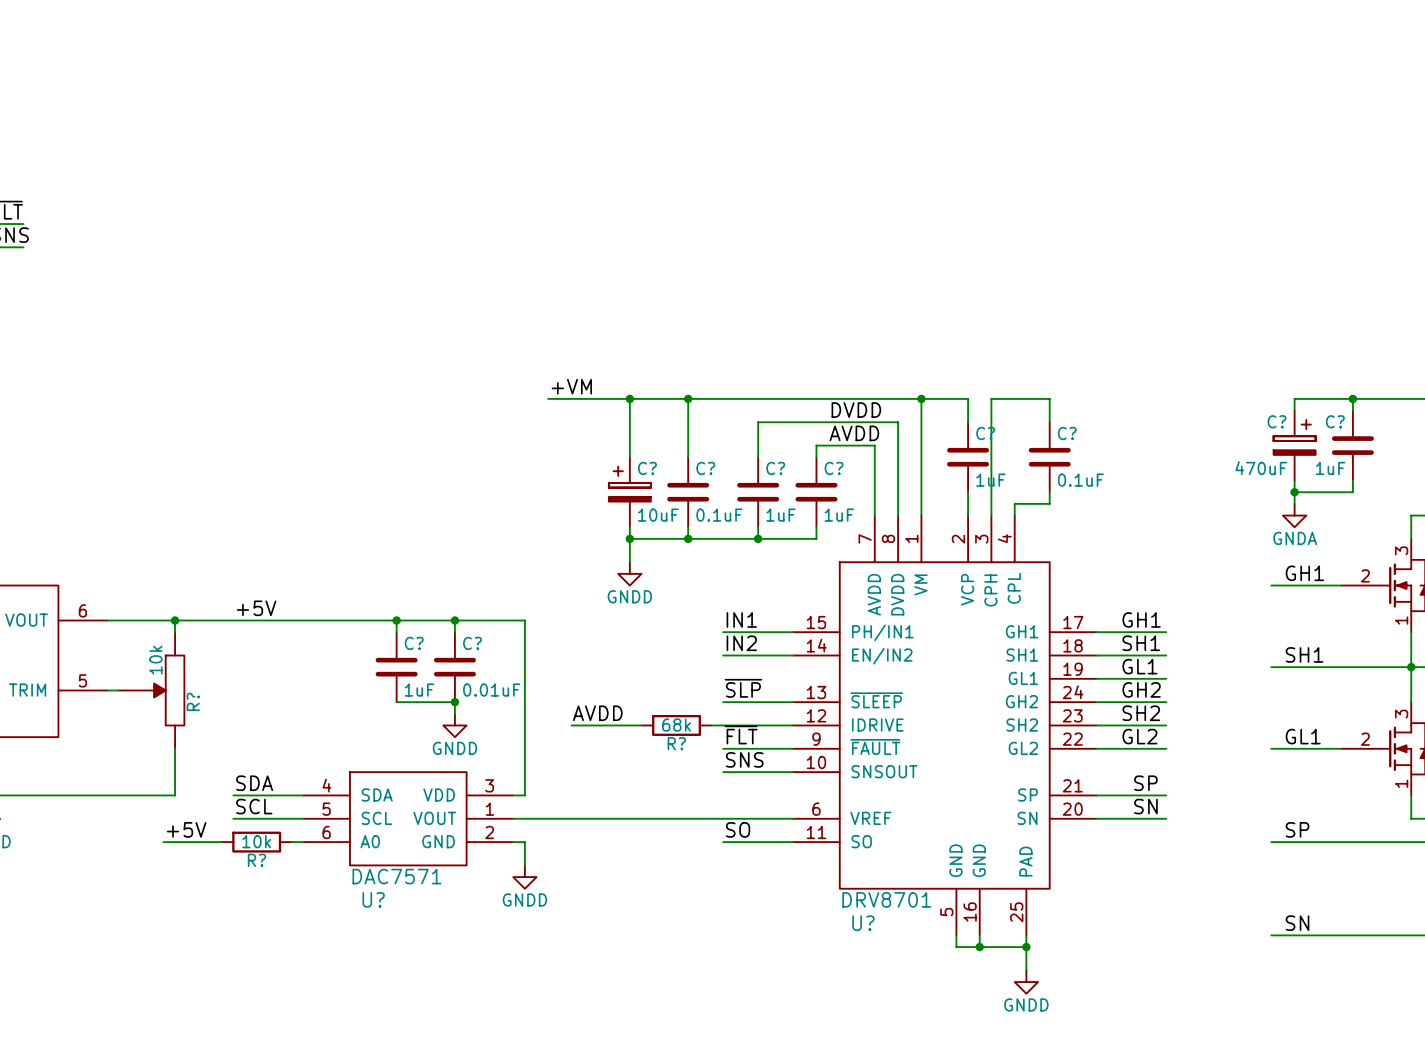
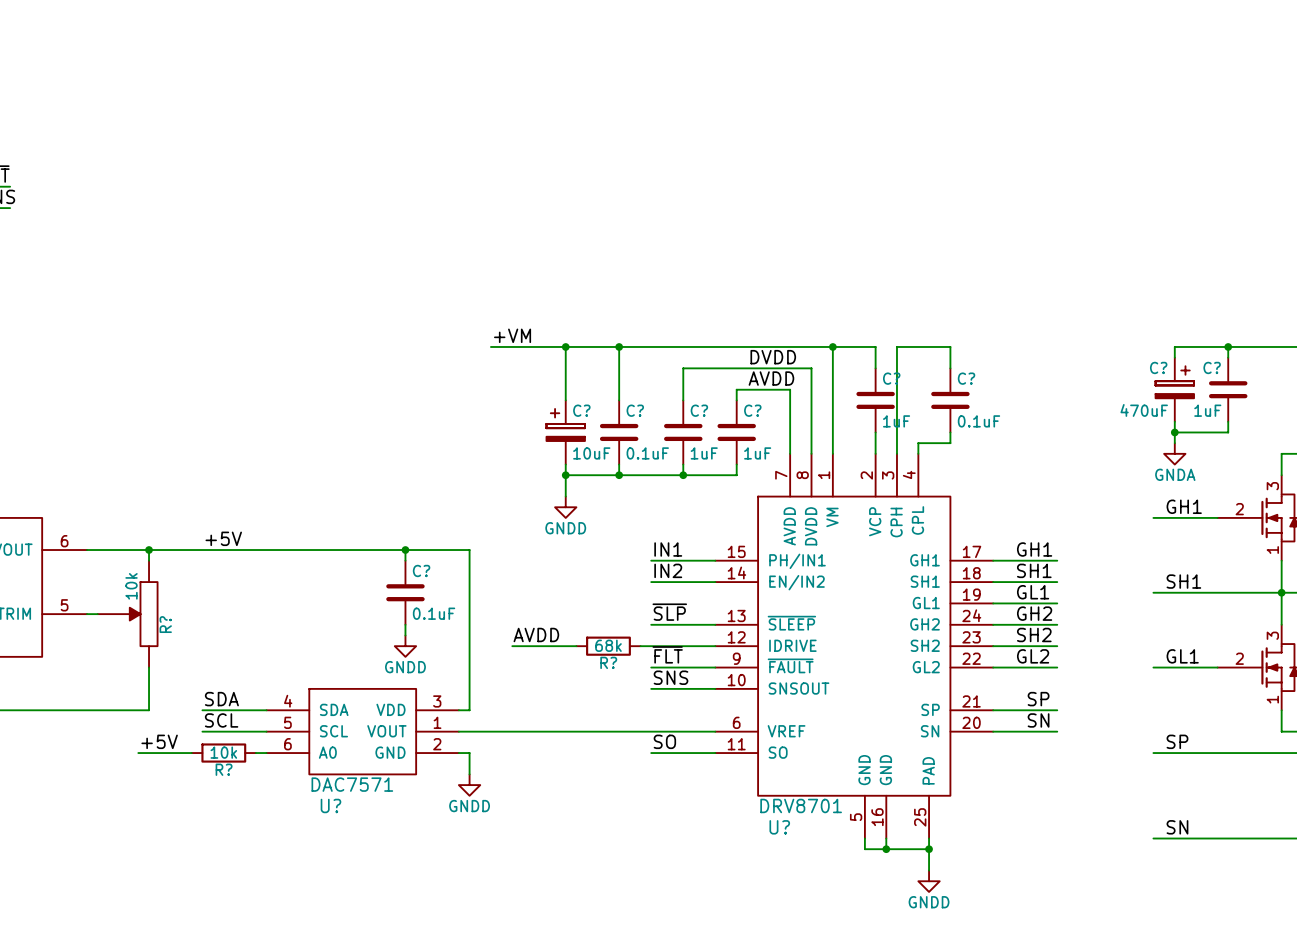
wire: (396, 620) (396, 632) -> none
junction: (396, 620) -> none
C?: 1uF (396, 667) -> none
C? value: 0.01uF (491, 690) -> 0.1uF (434, 613)
wire: (396, 702) (454, 702) -> none
junction: (454, 702) -> none

